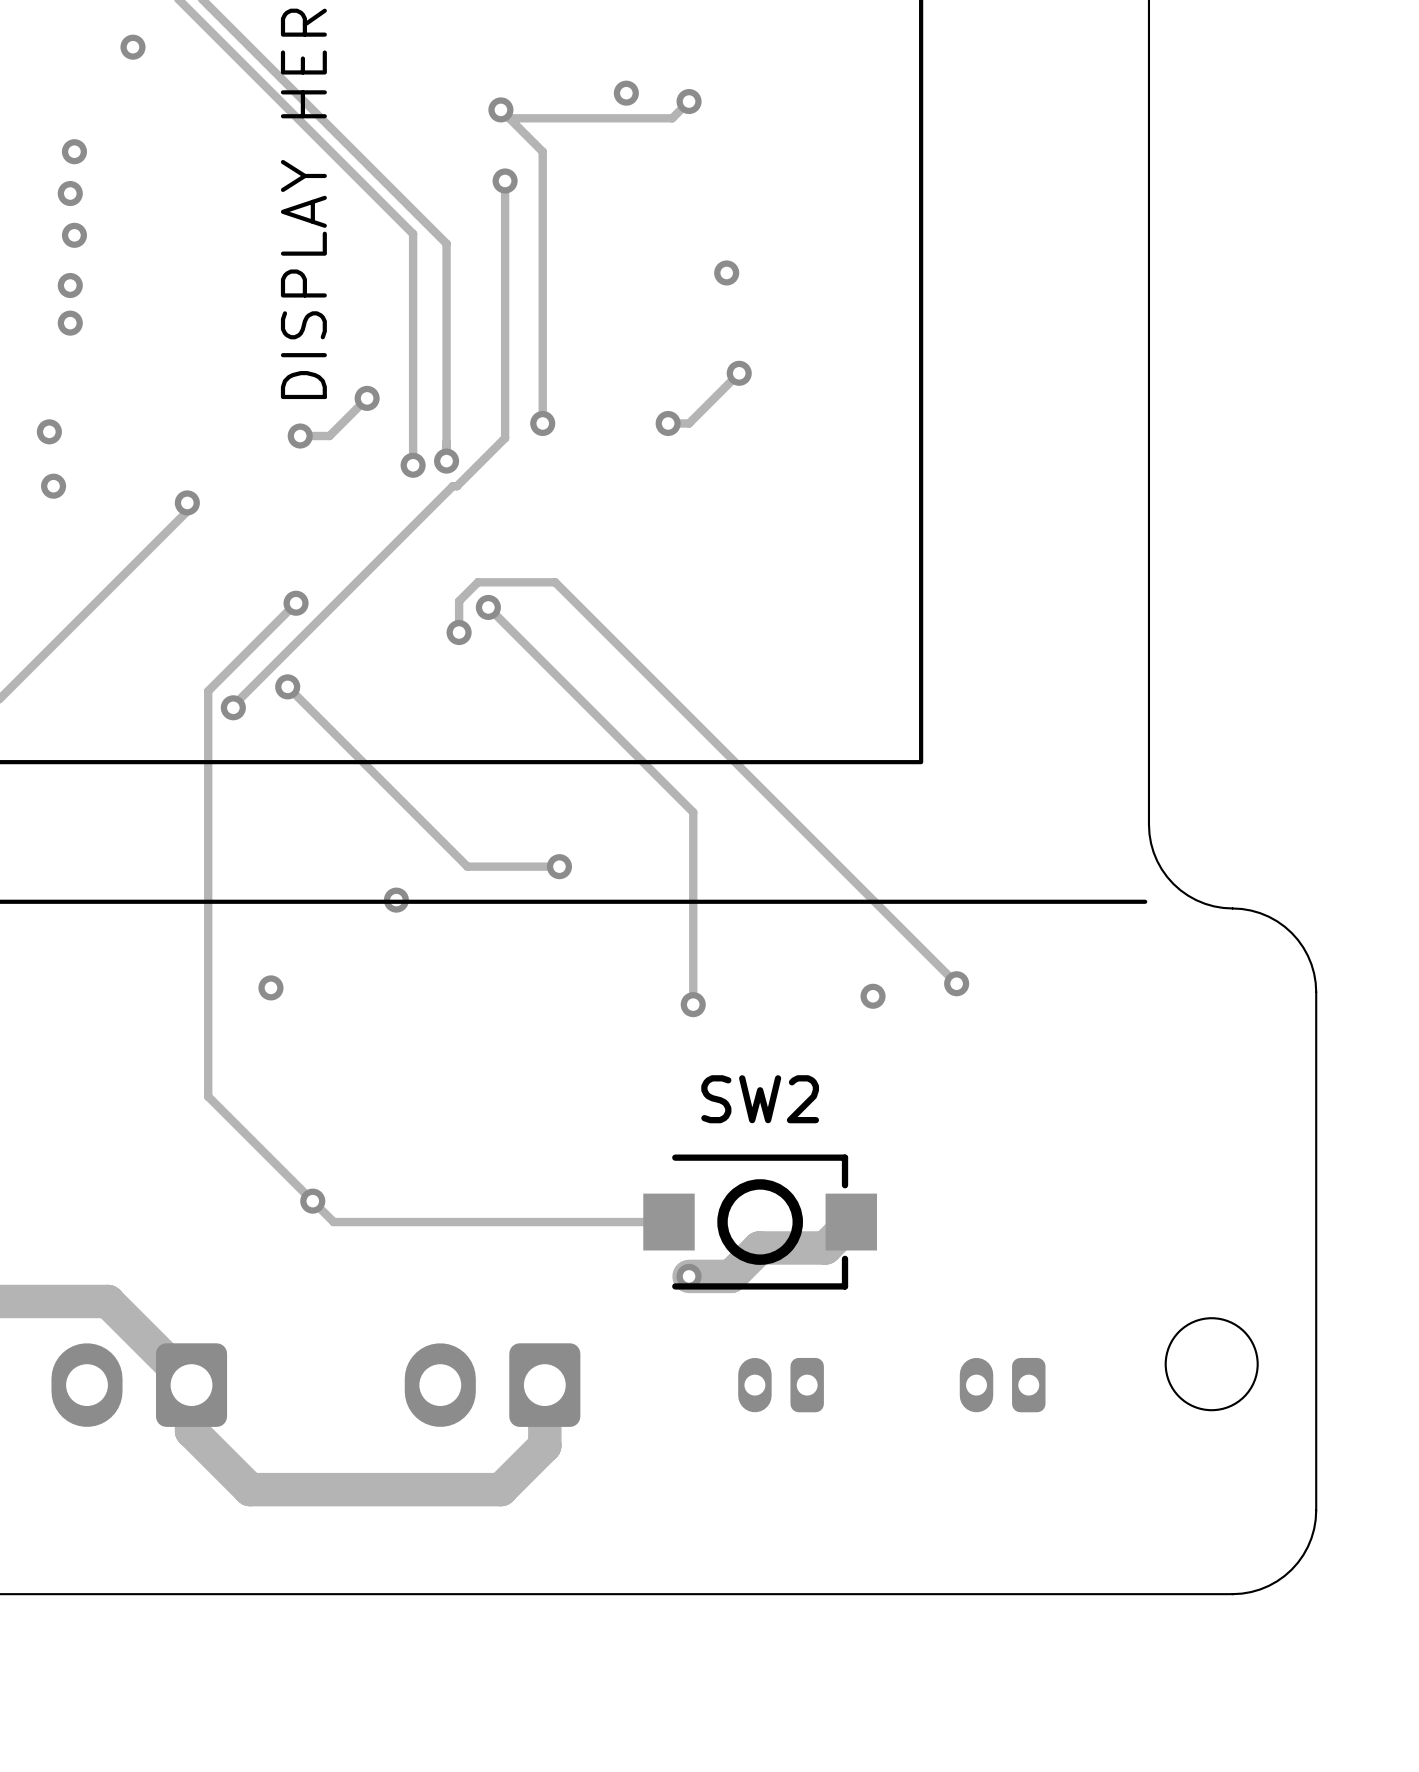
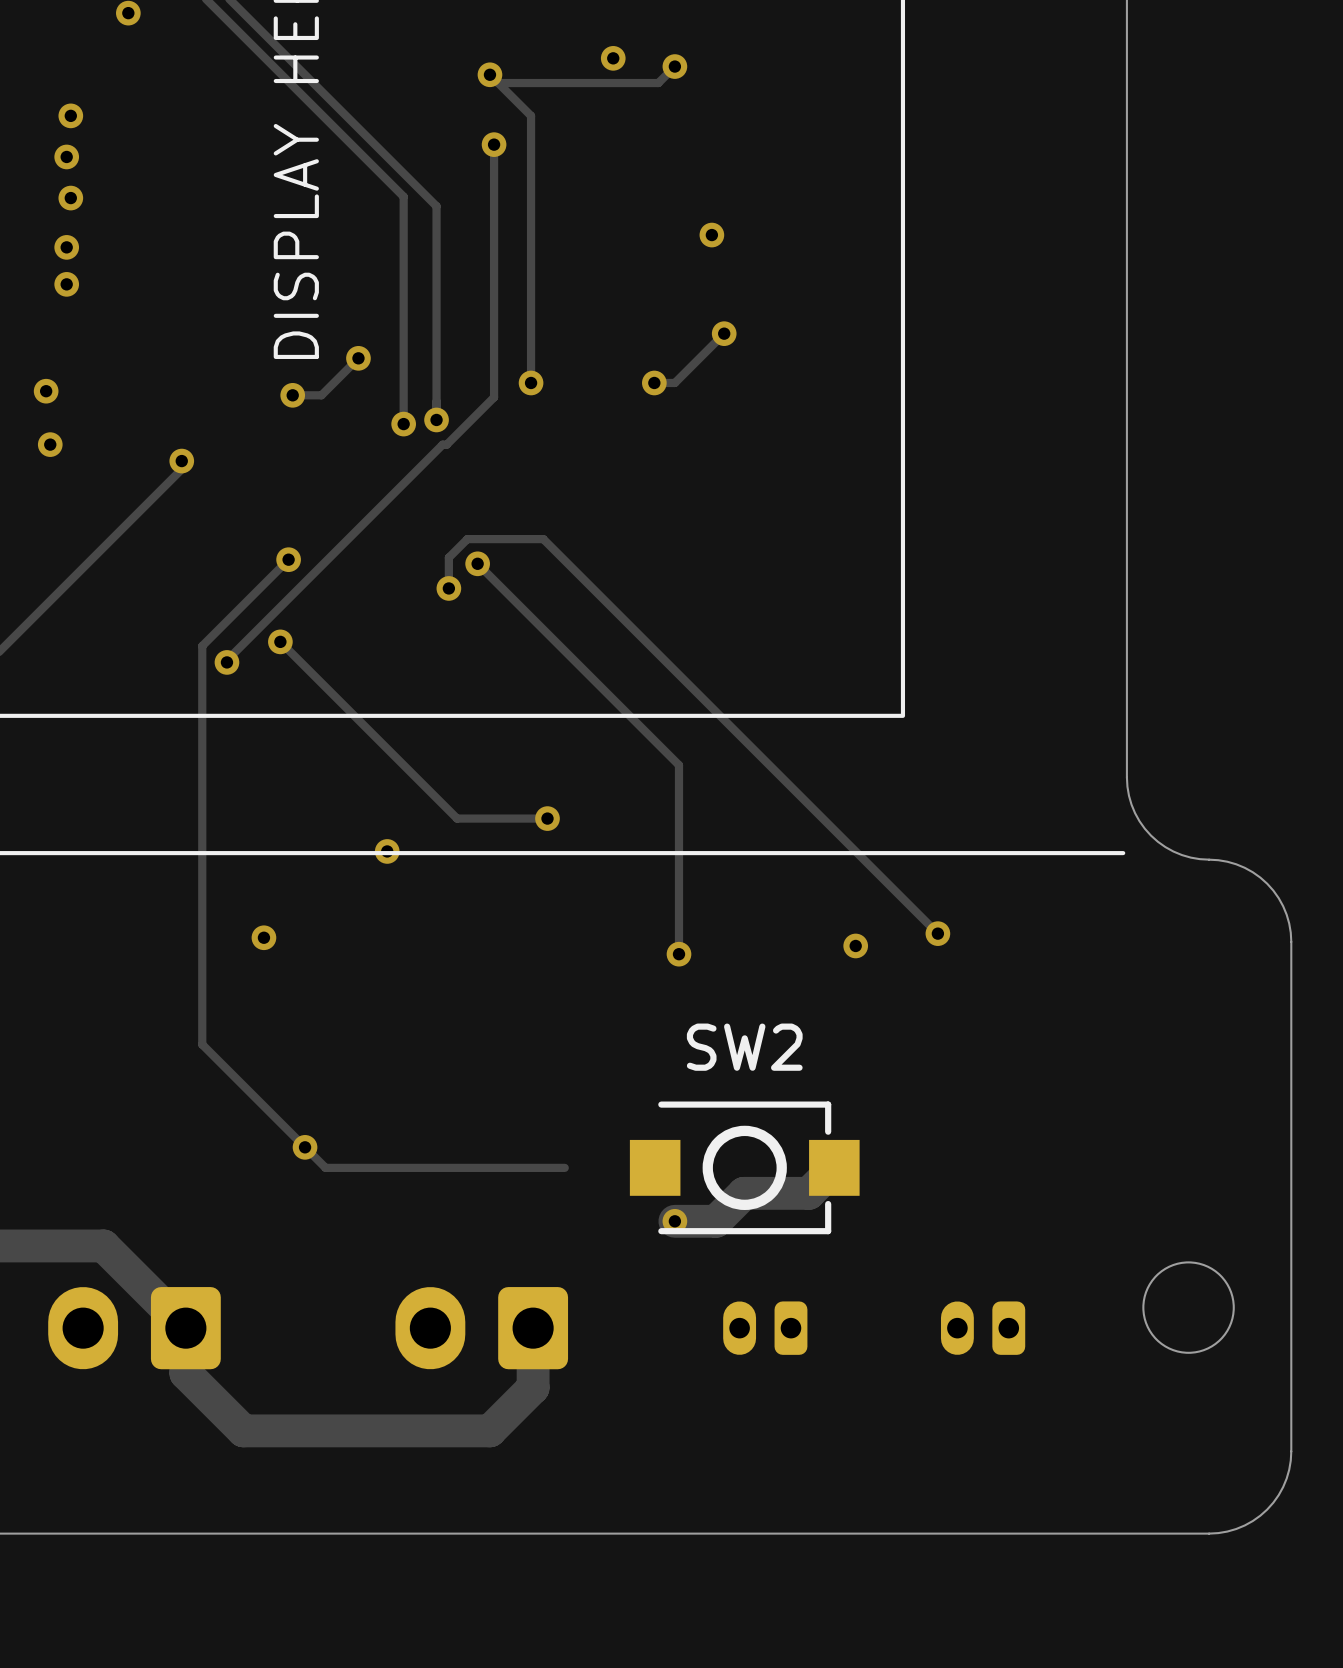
track: (669, 1222) (577, 1222) -> none

